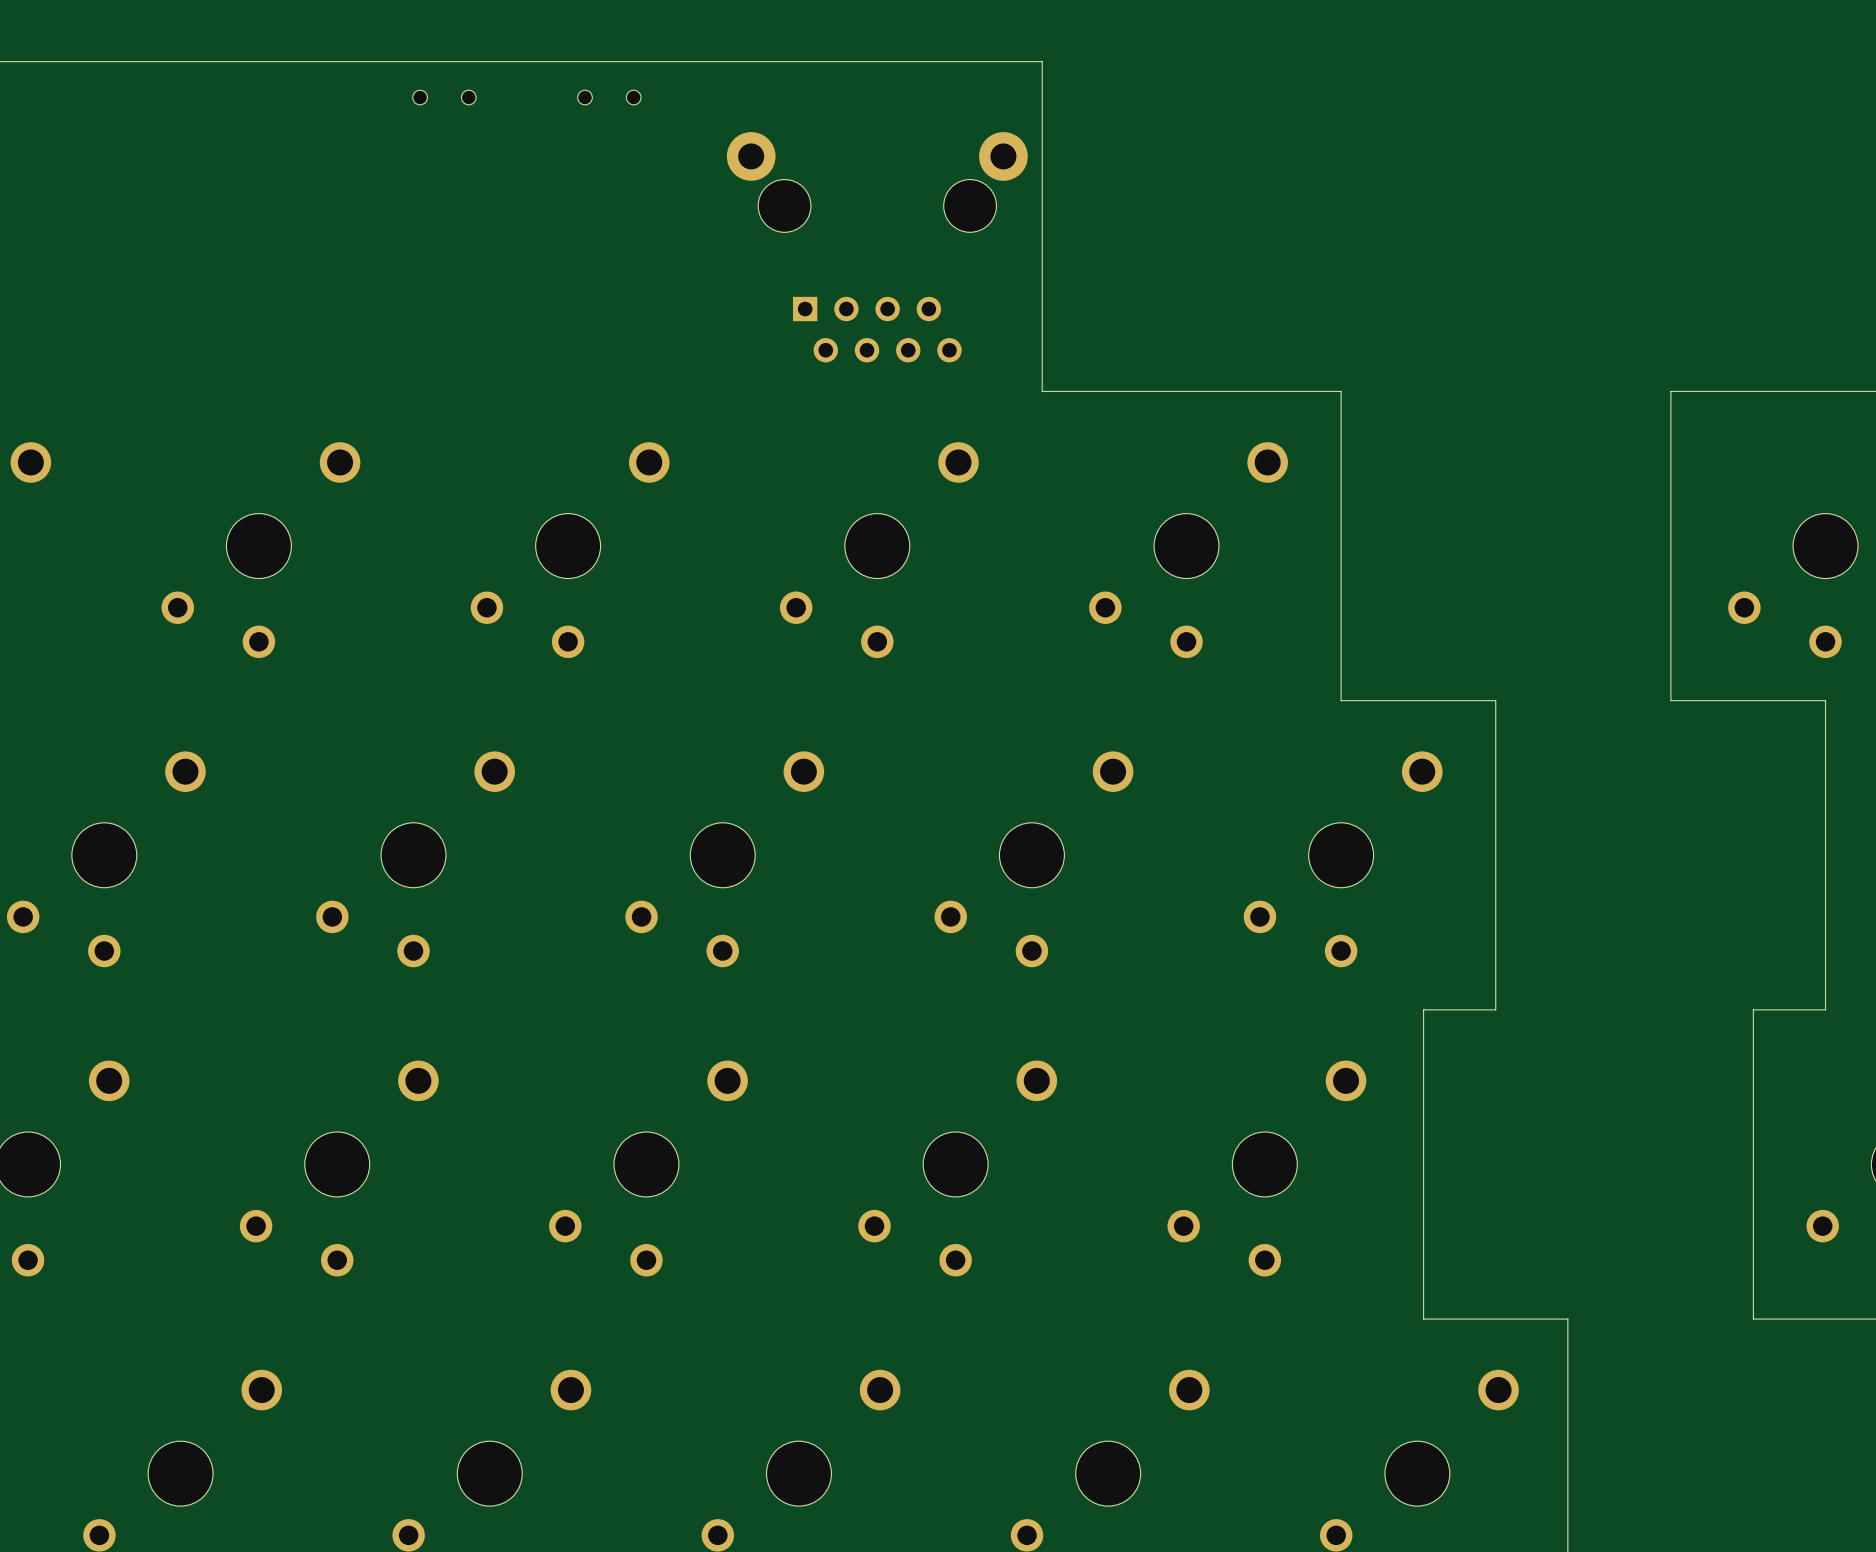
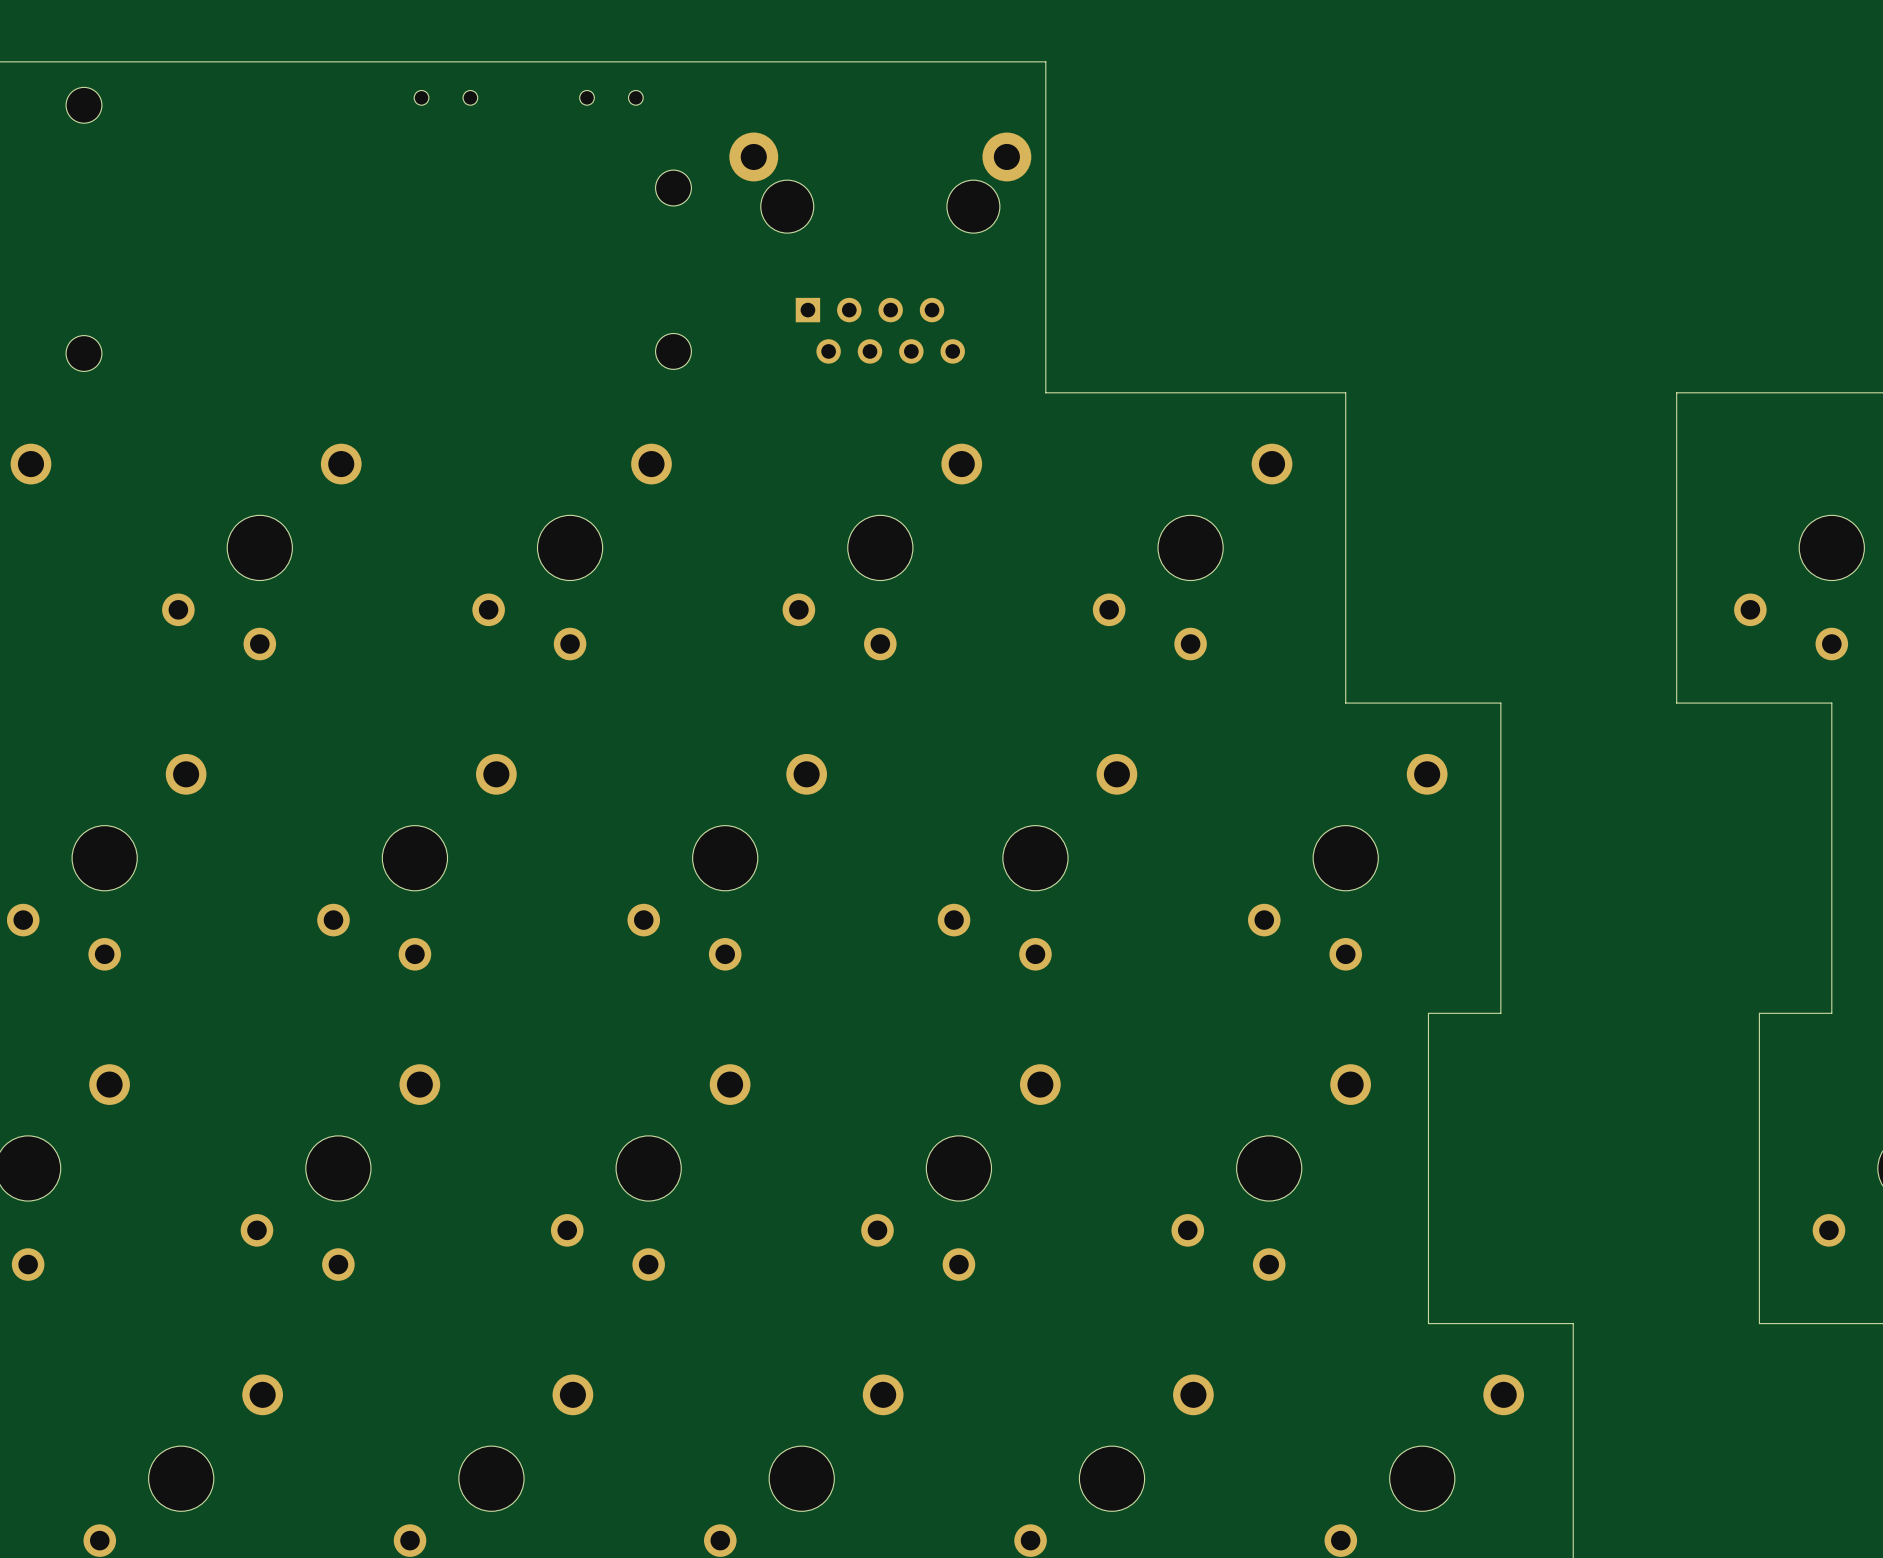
part: none -> (83, 105)
part: none -> (673, 188)
part: none -> (673, 351)
part: none -> (83, 353)

